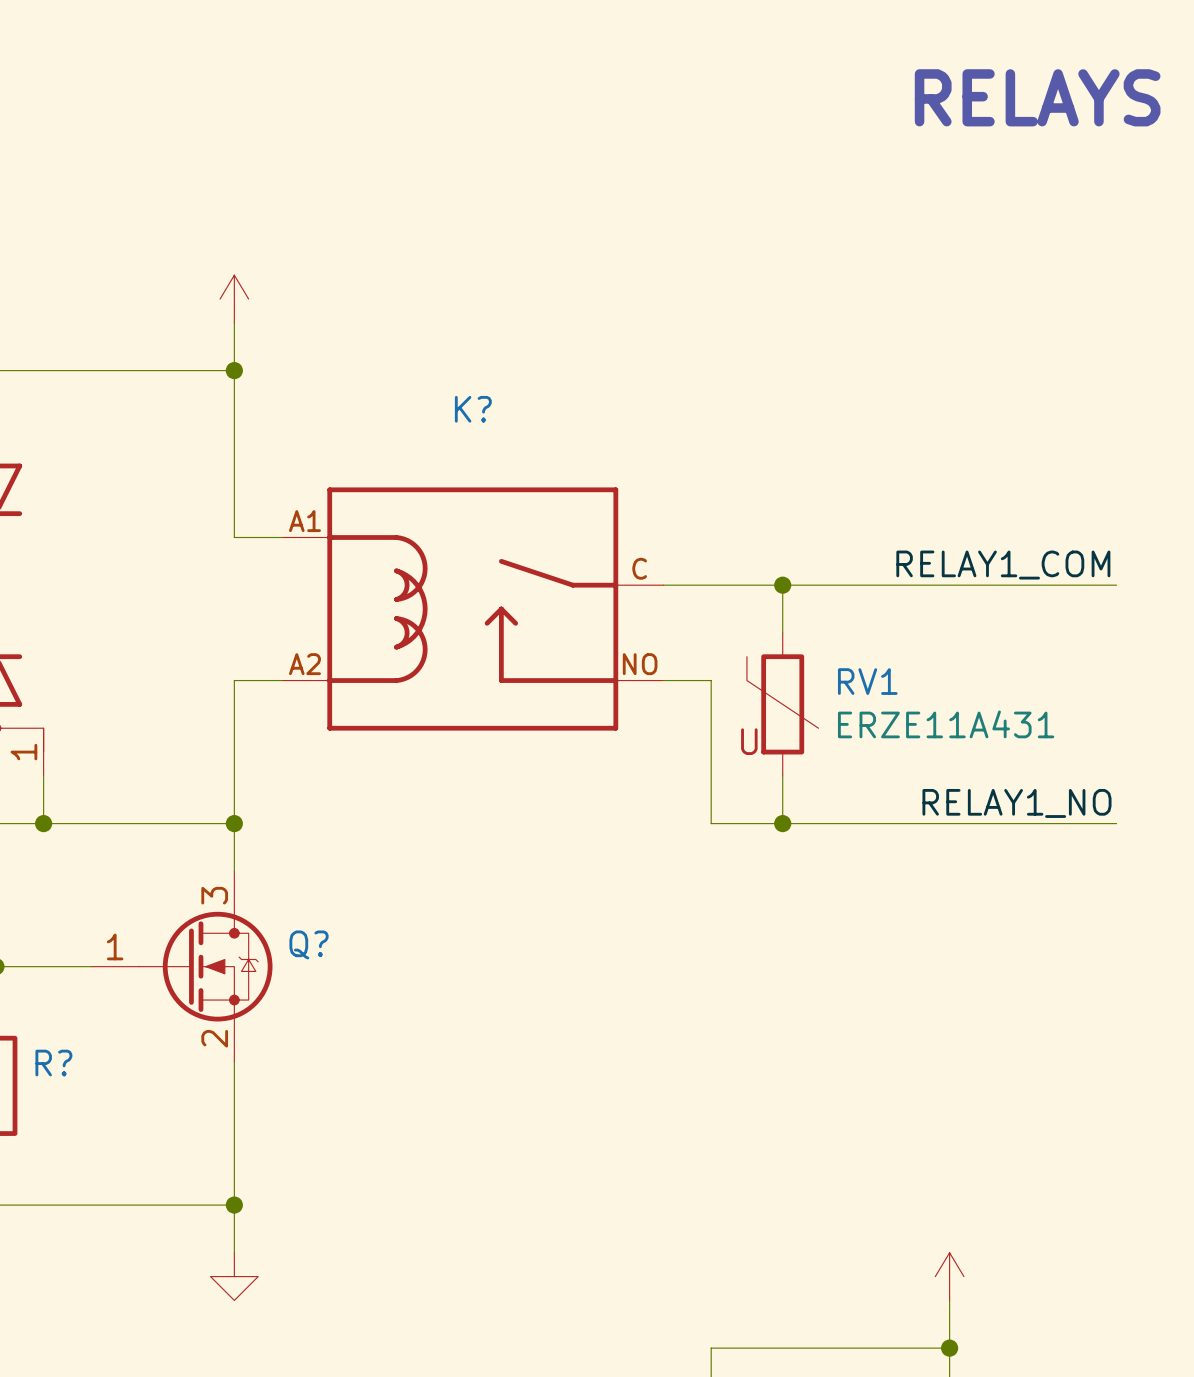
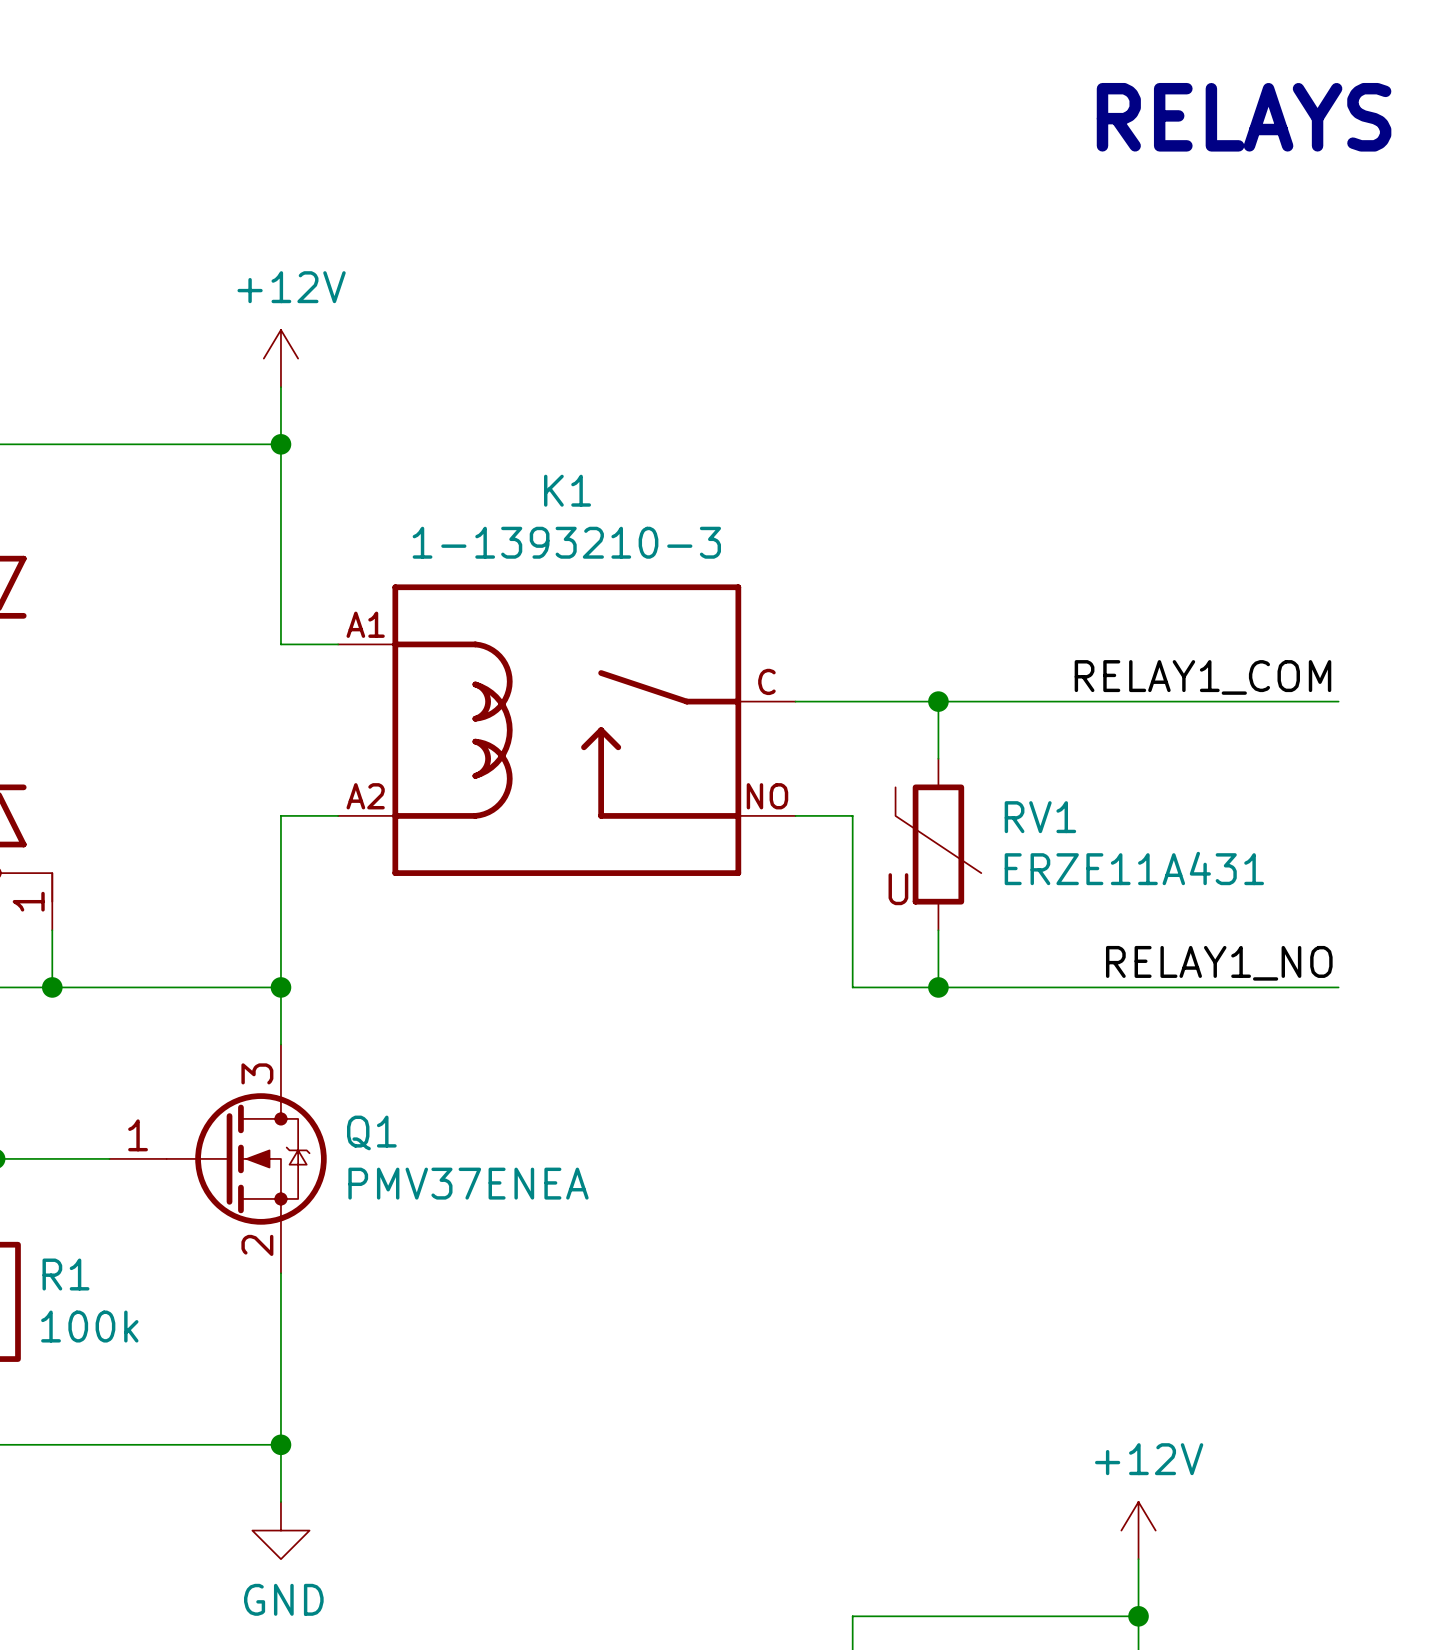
power symbol text: none -> +12V (291, 287)
K? name: K? (473, 409) -> K1 (567, 490)
K? value: none -> 1-1393210-3 (566, 542)
Q? name: Q? (309, 944) -> Q1 (371, 1132)
Q? value: none -> PMV37ENEA (468, 1183)
R? name: R? (53, 1063) -> R1 (65, 1274)
R? value: none -> 100k (89, 1326)
power symbol text: none -> +12V (1149, 1459)
power symbol text: none -> GND (283, 1599)

